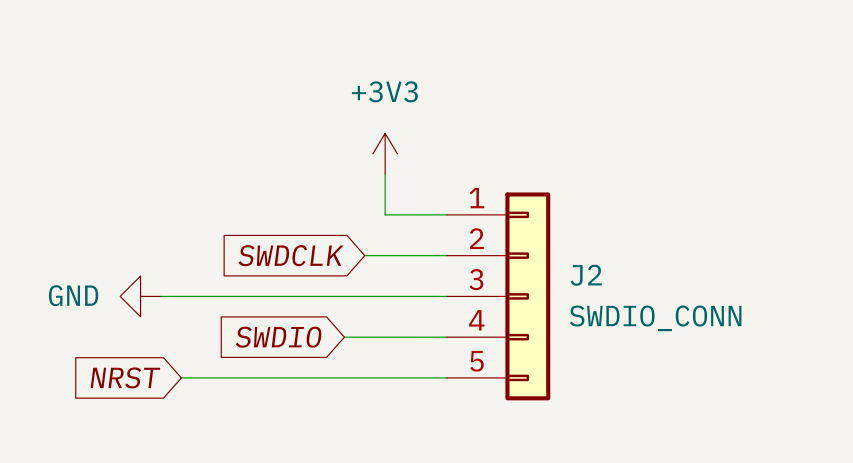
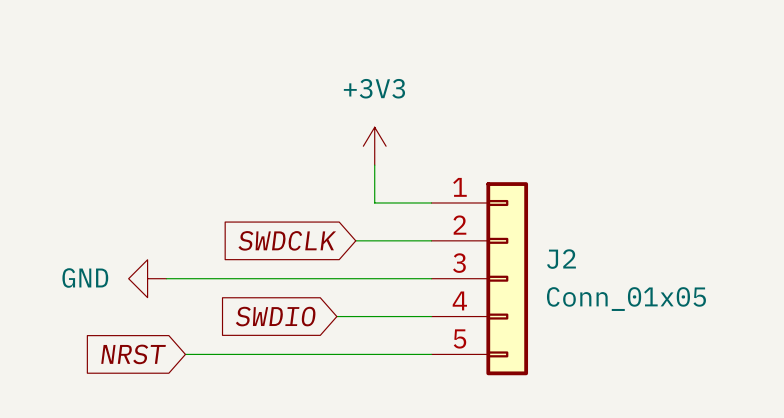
J2 value: SWDIO_CONN (655, 318) -> Conn_01x05 (626, 299)

